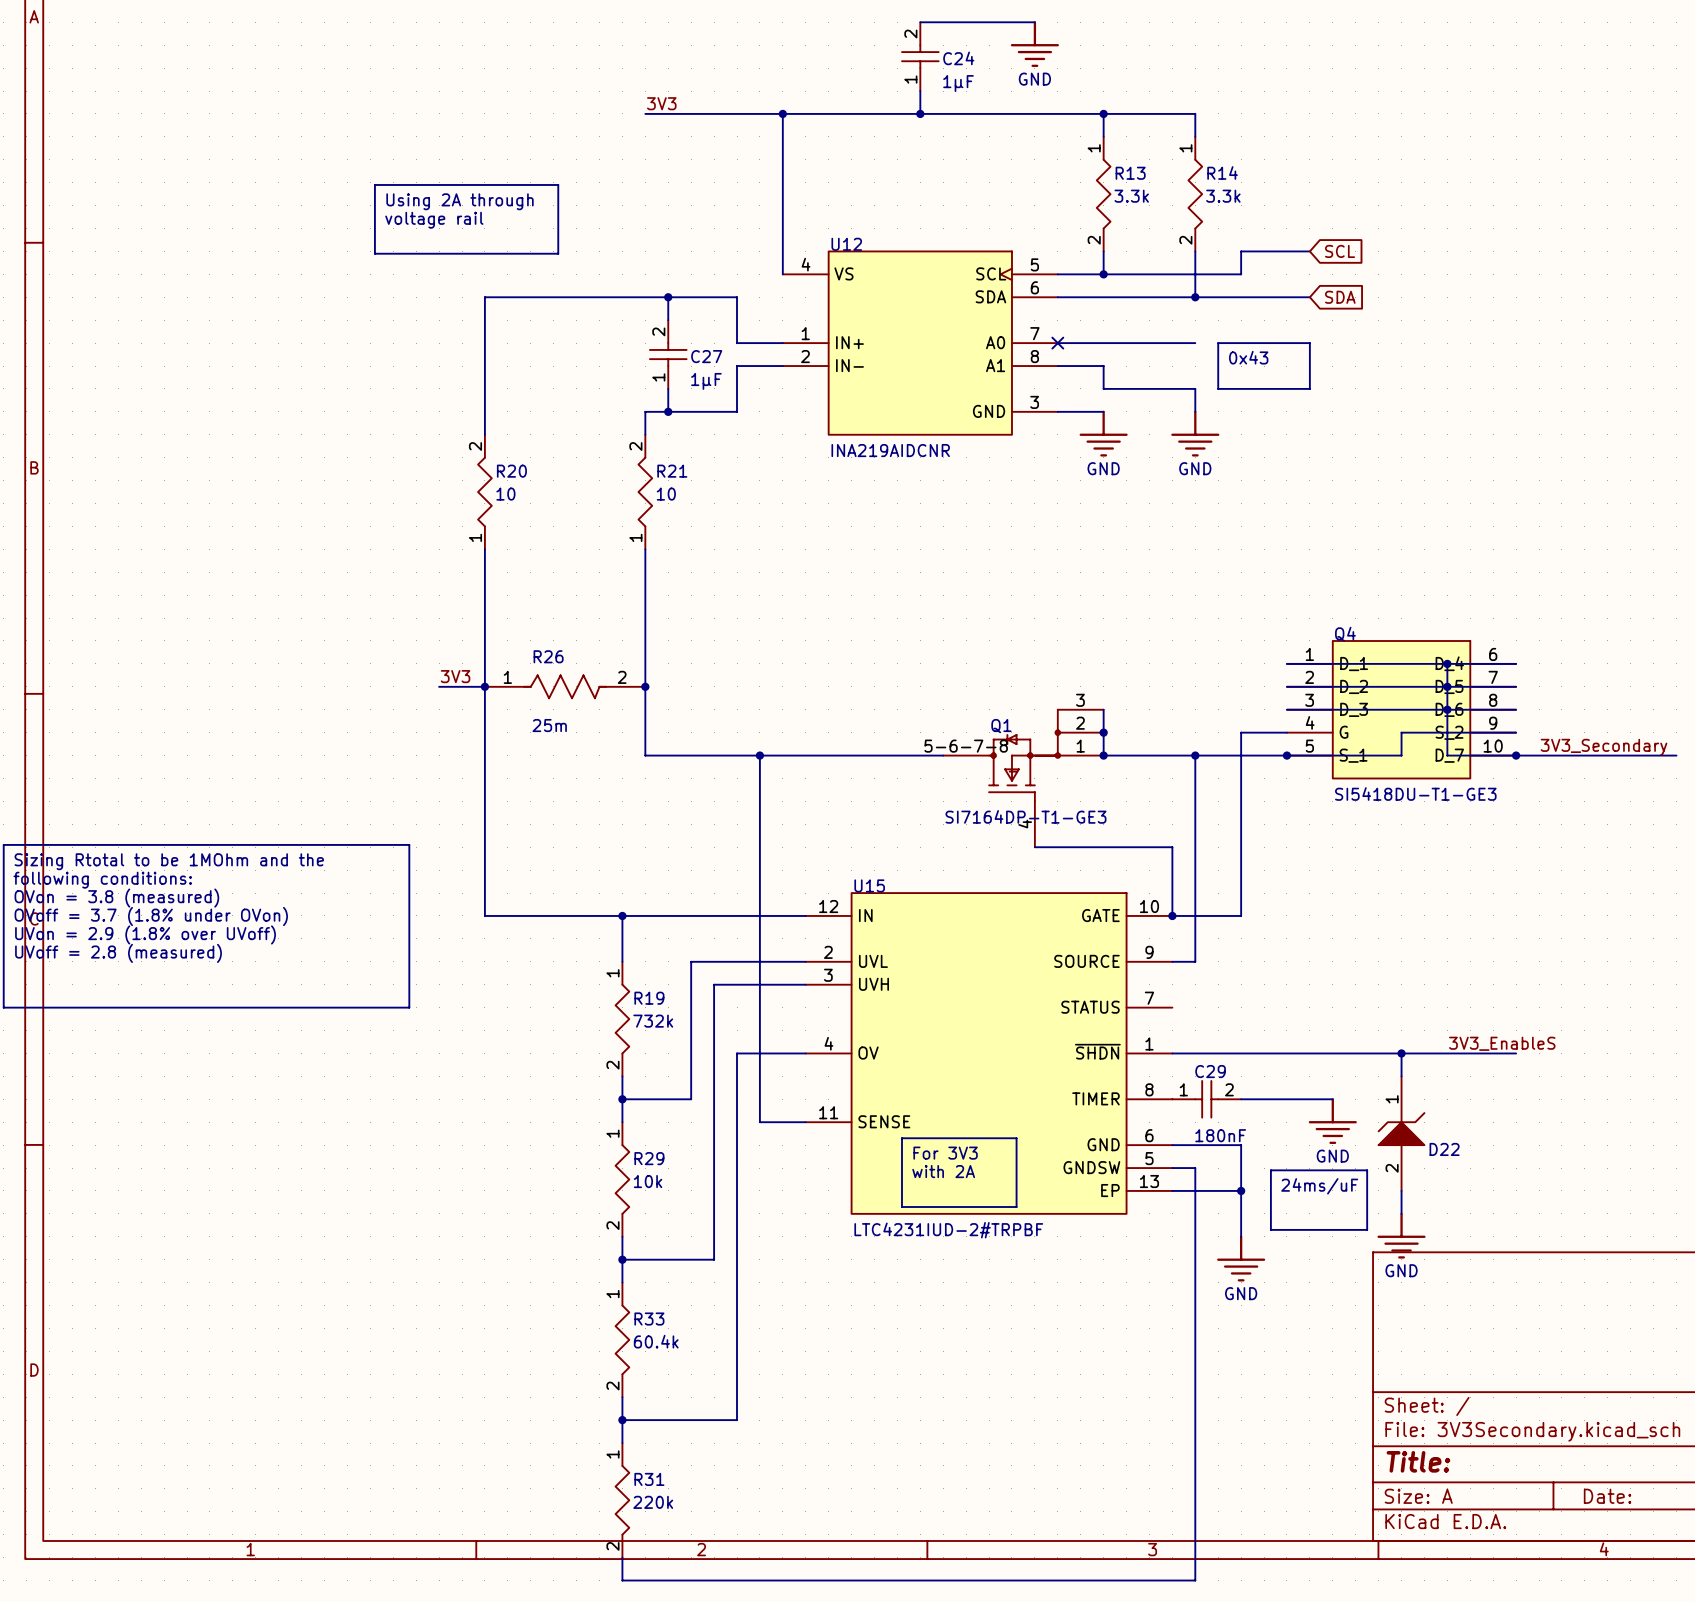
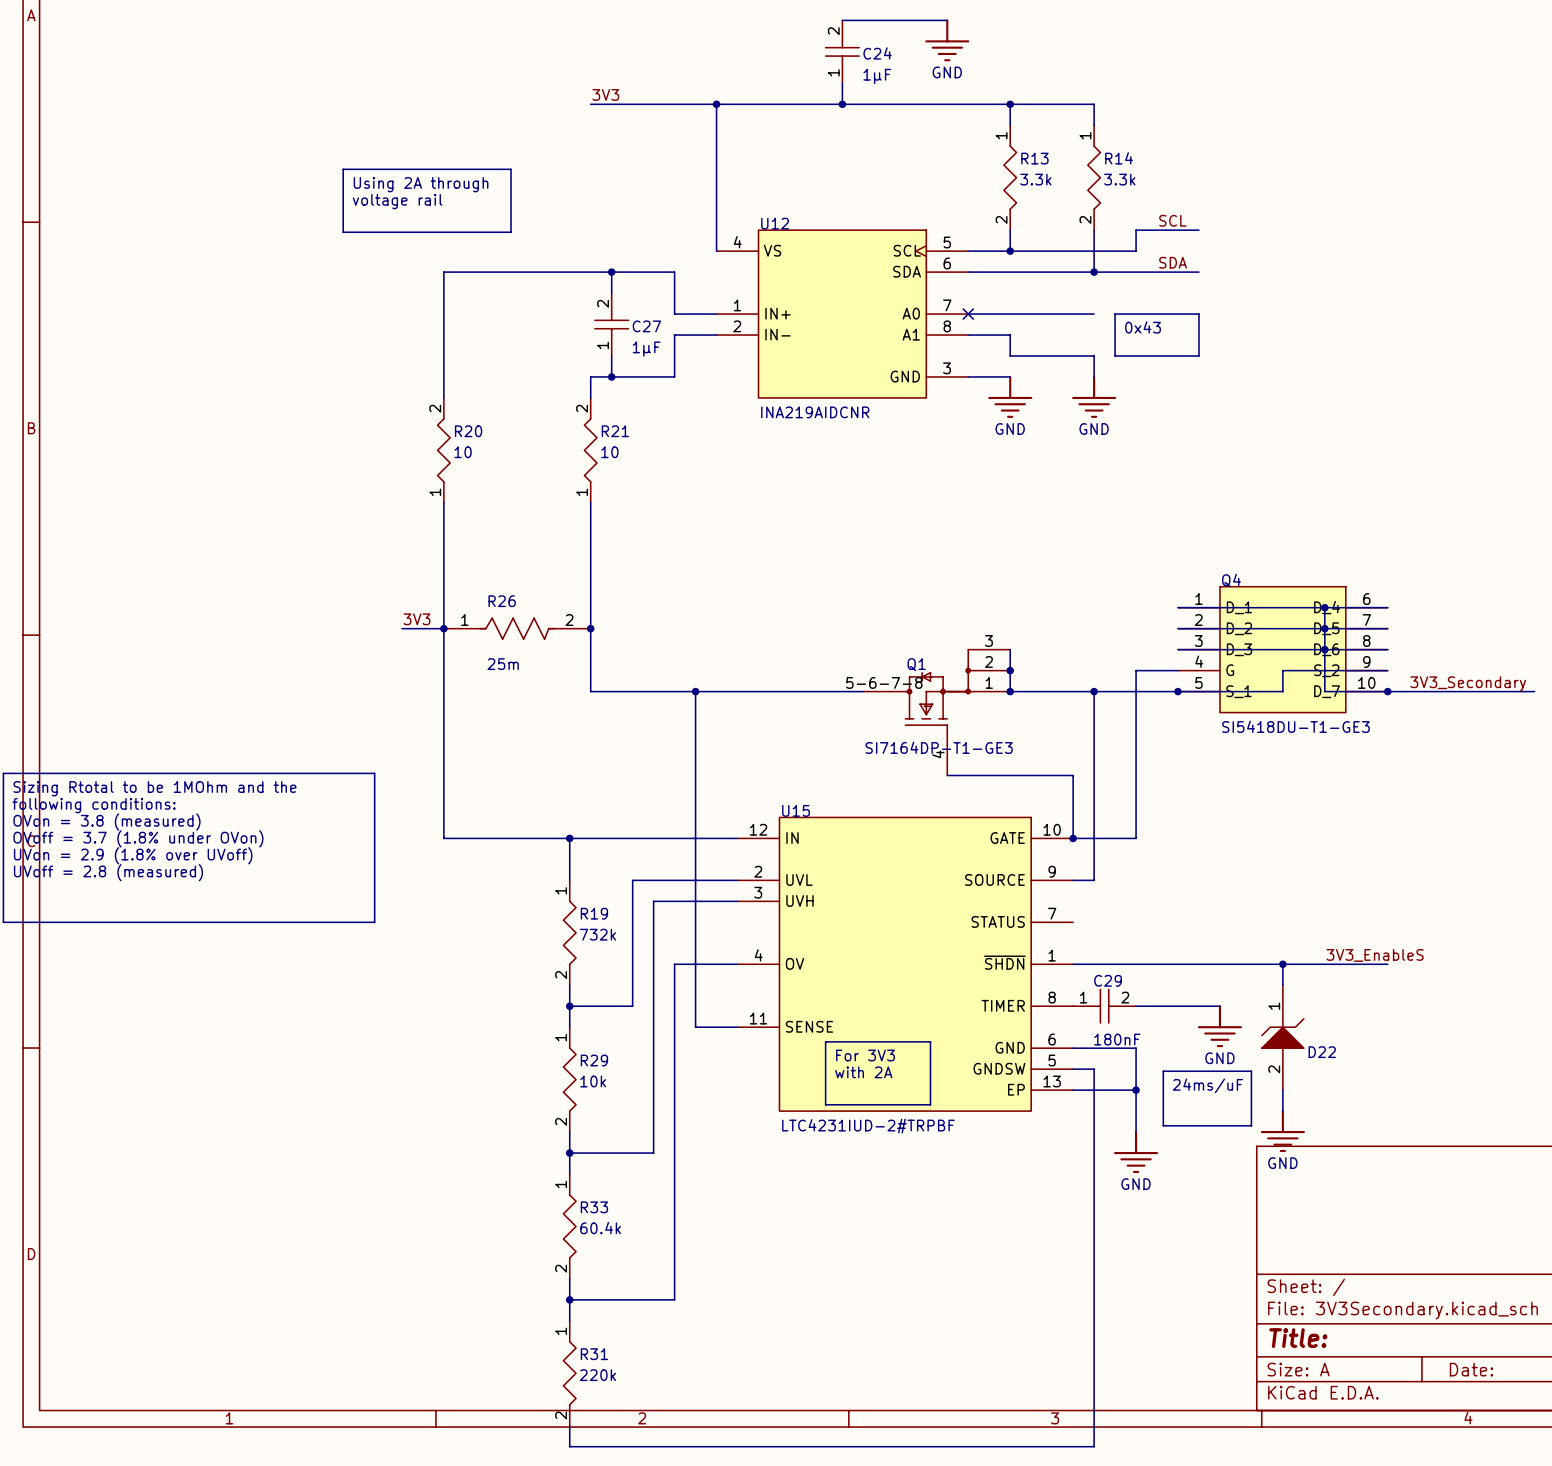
label: none -> SCL (1172, 220)
global label: SCL (1340, 251) -> none
label: none -> SDA (1173, 262)
global label: SDA (1340, 297) -> none

